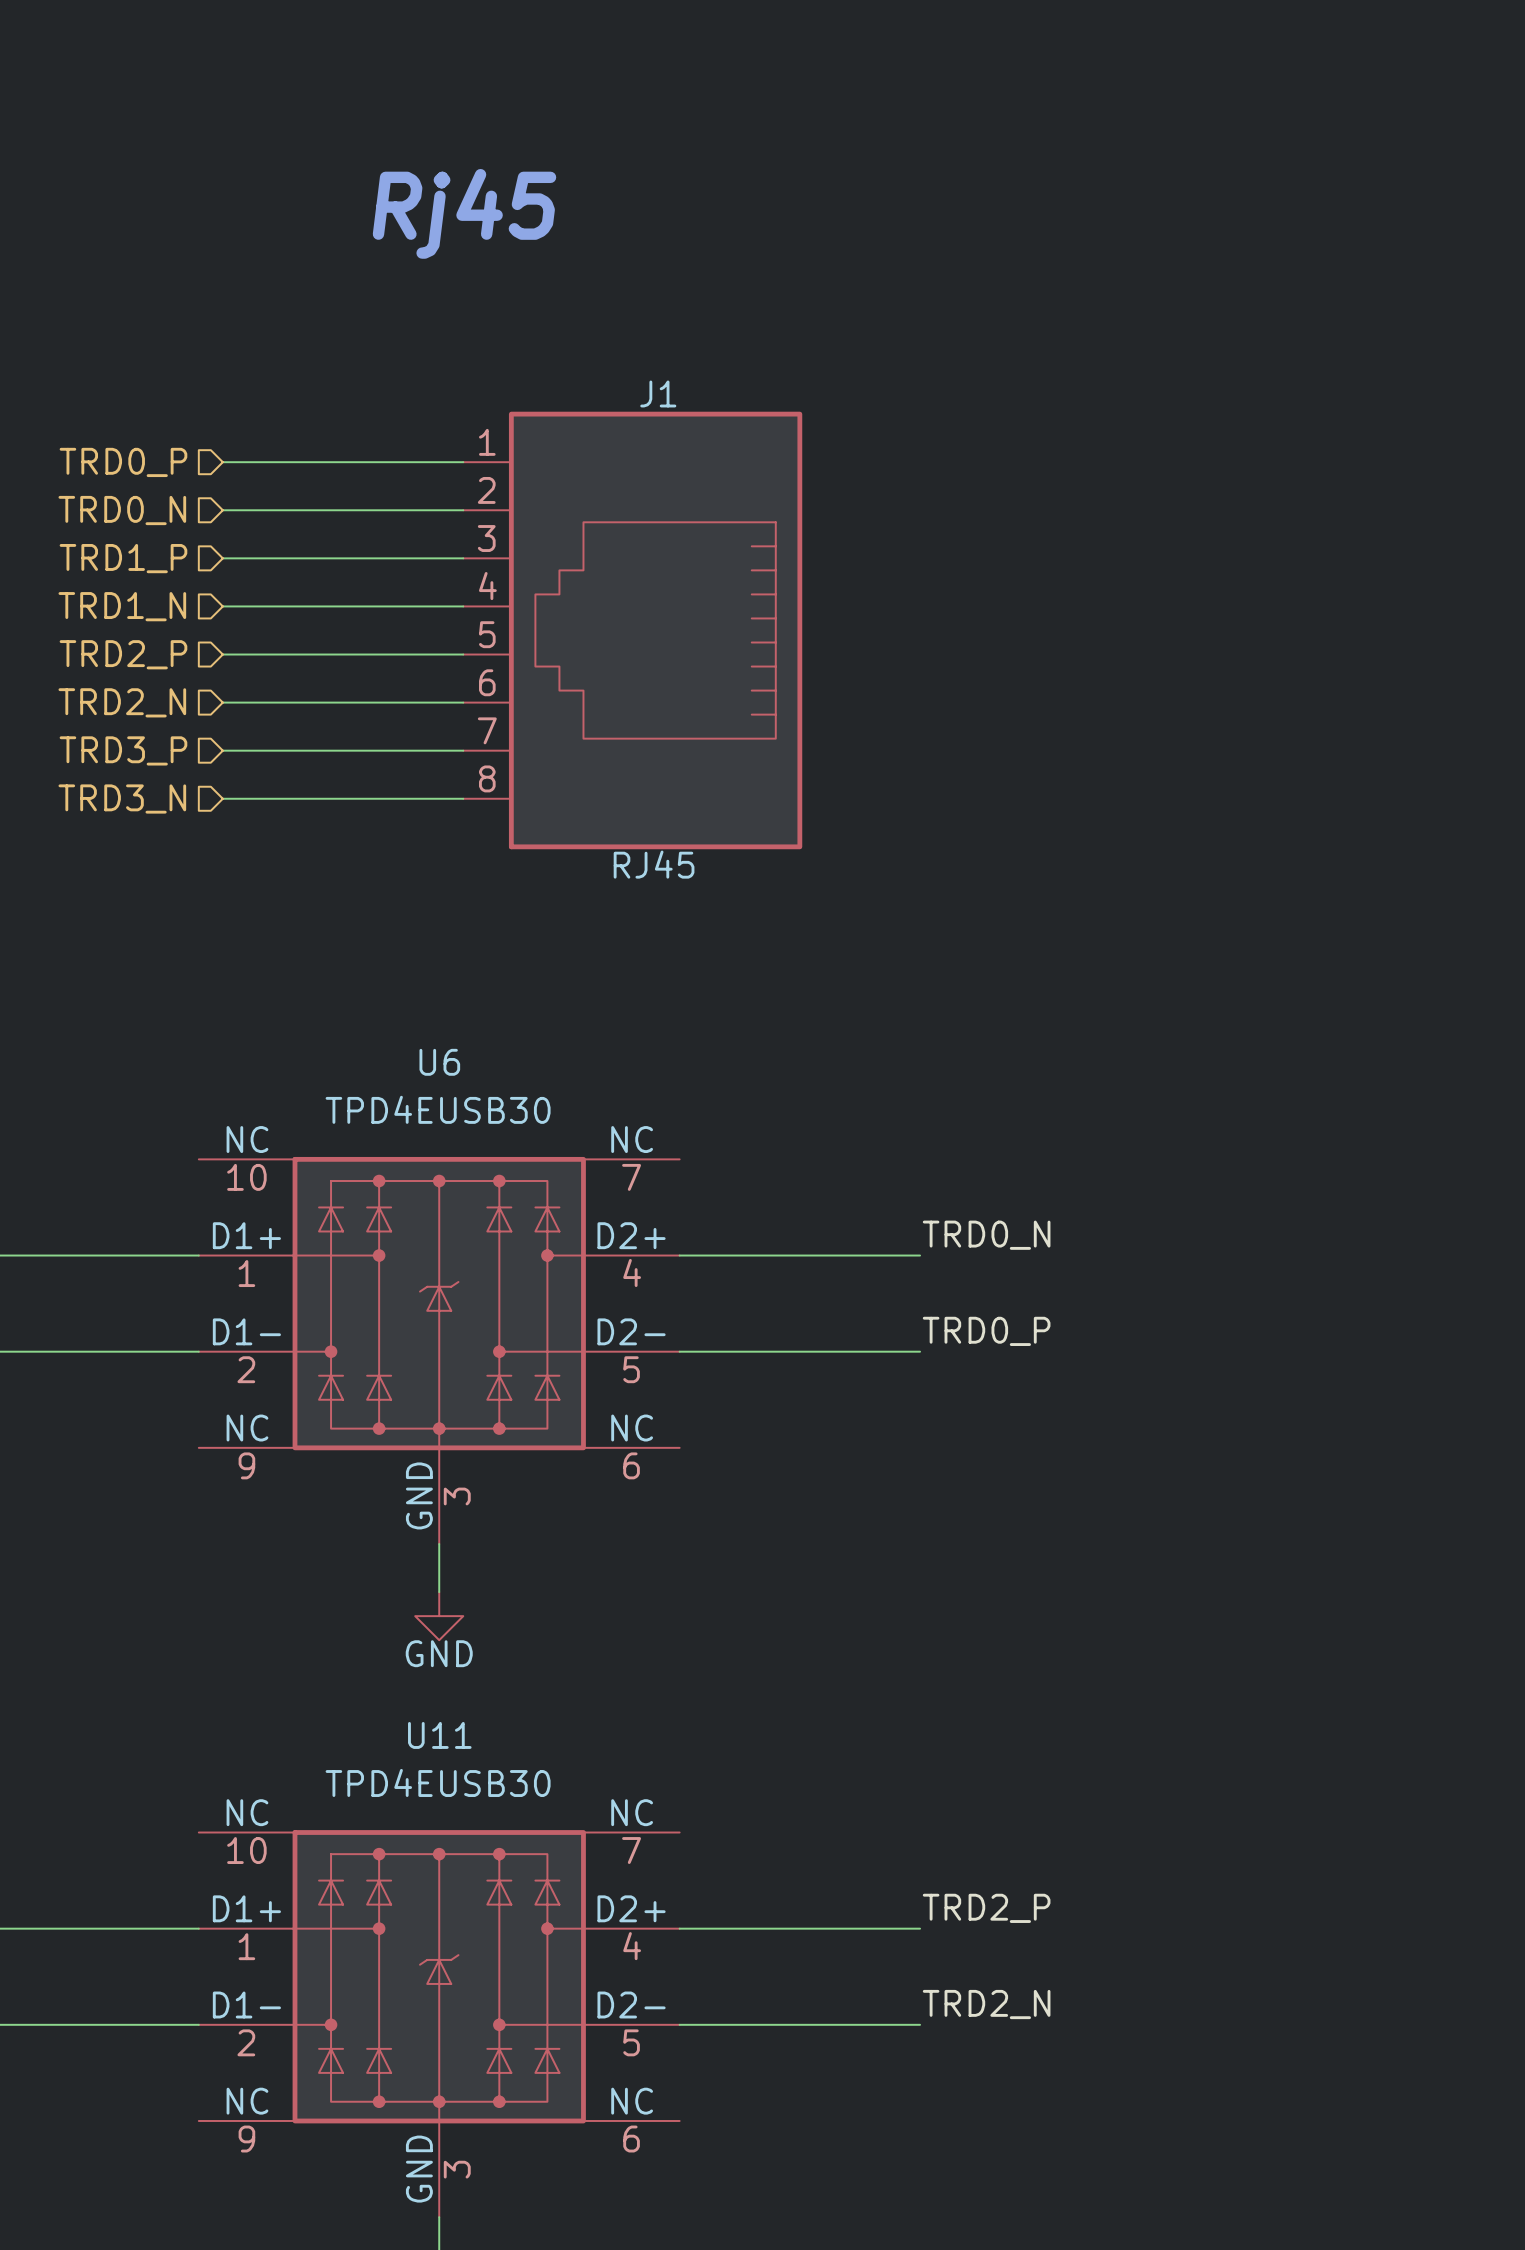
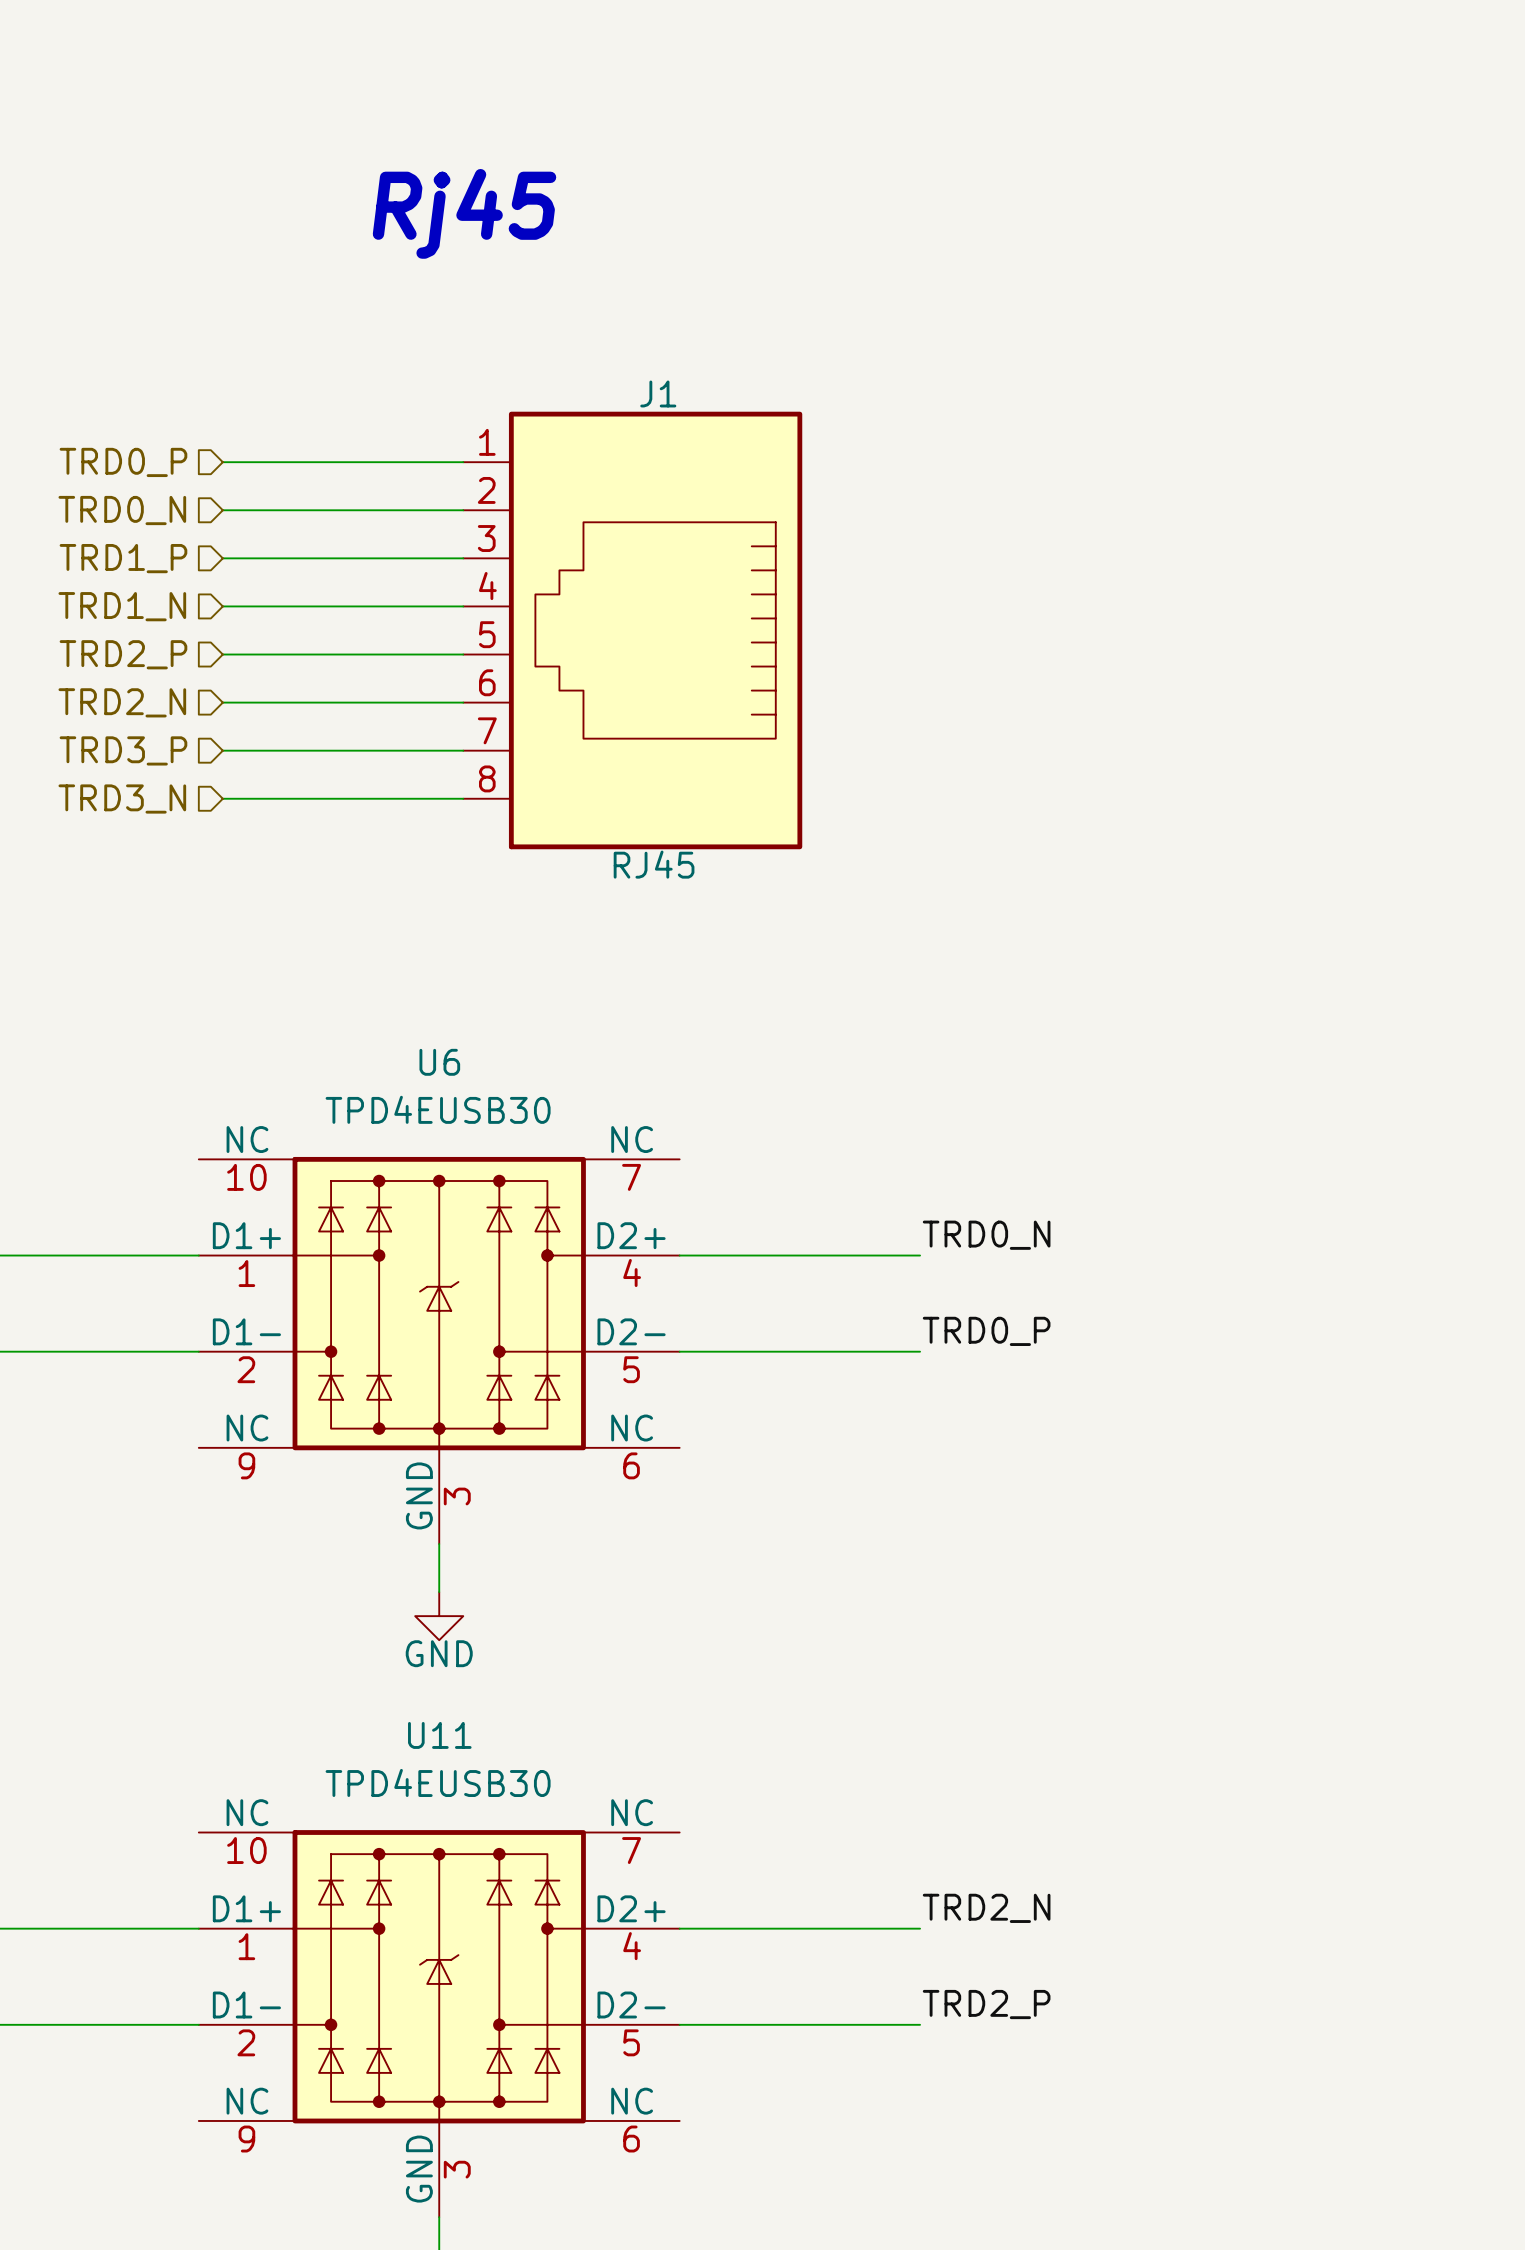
label: TRD2_P (986, 1908) -> TRD2_N (986, 1908)
label: TRD2_N (986, 2004) -> TRD2_P (986, 2004)

